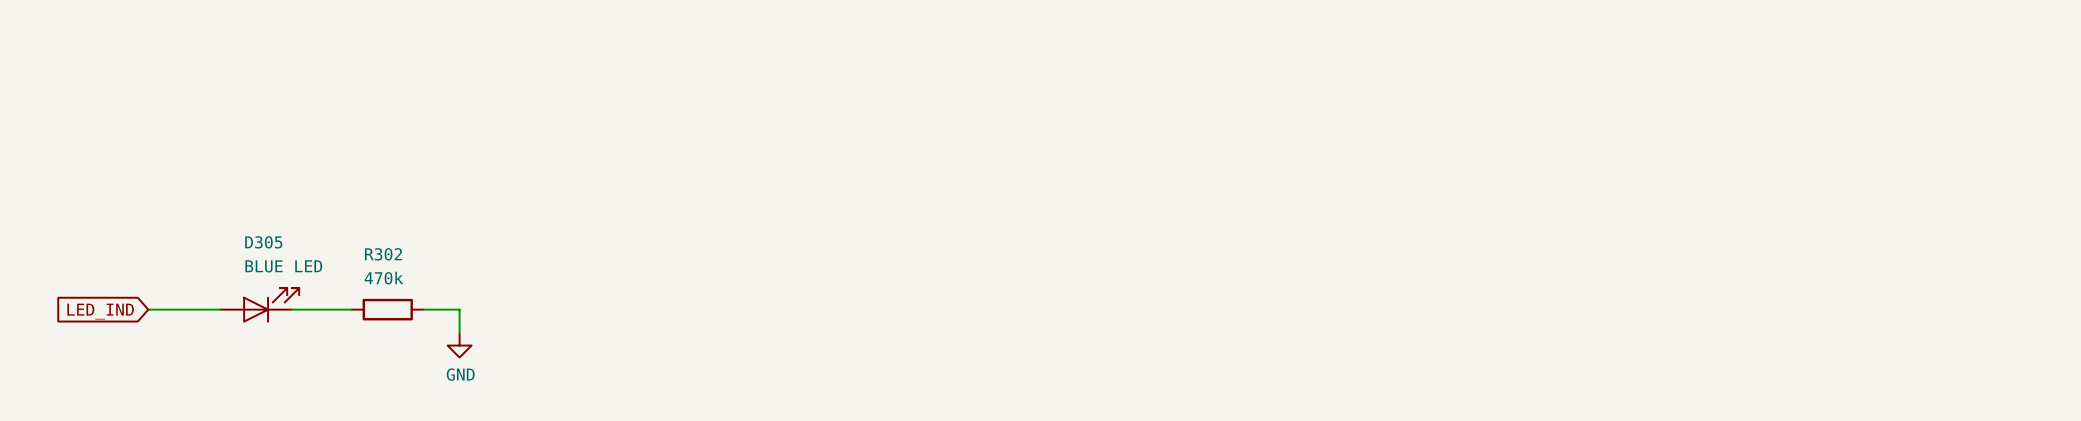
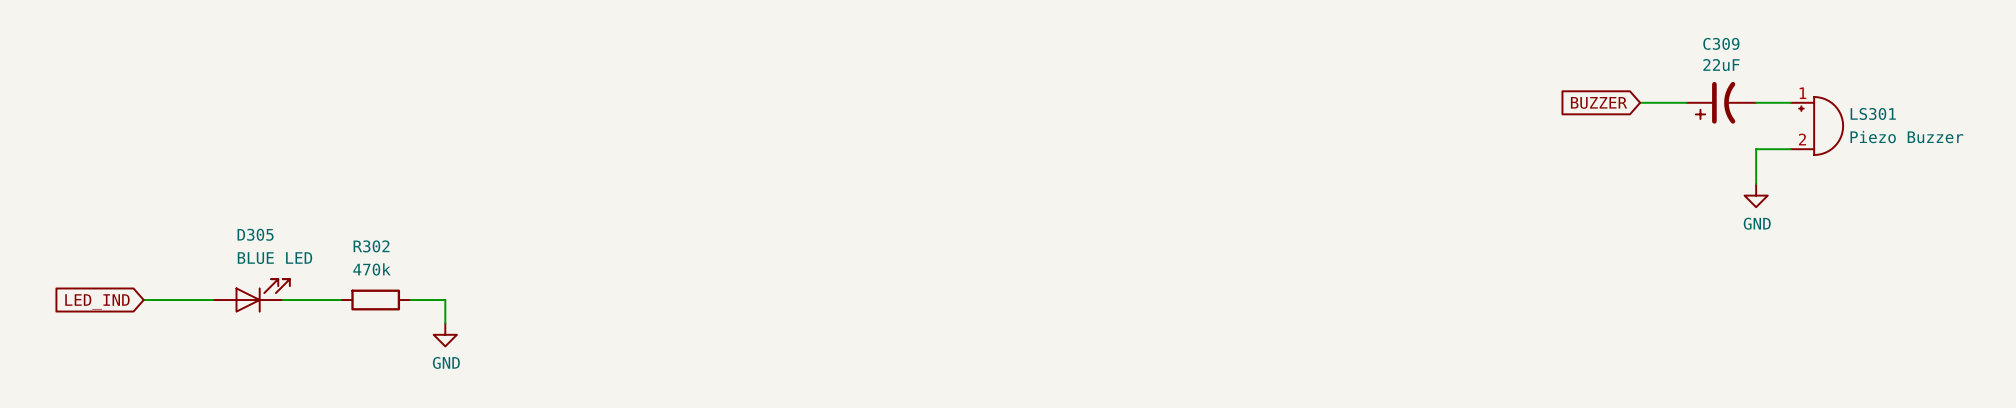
global label: none -> BUZZER (1599, 102)
wire: none -> (1640, 102) (1686, 102)
C309: none -> 22uF (1721, 102)
wire: none -> (1756, 102) (1790, 102)
LS301: none -> Piezo Buzzer (1817, 126)
wire: none -> (1790, 149) (1756, 149) (1756, 184)
power symbol: none -> GND (1756, 195)

